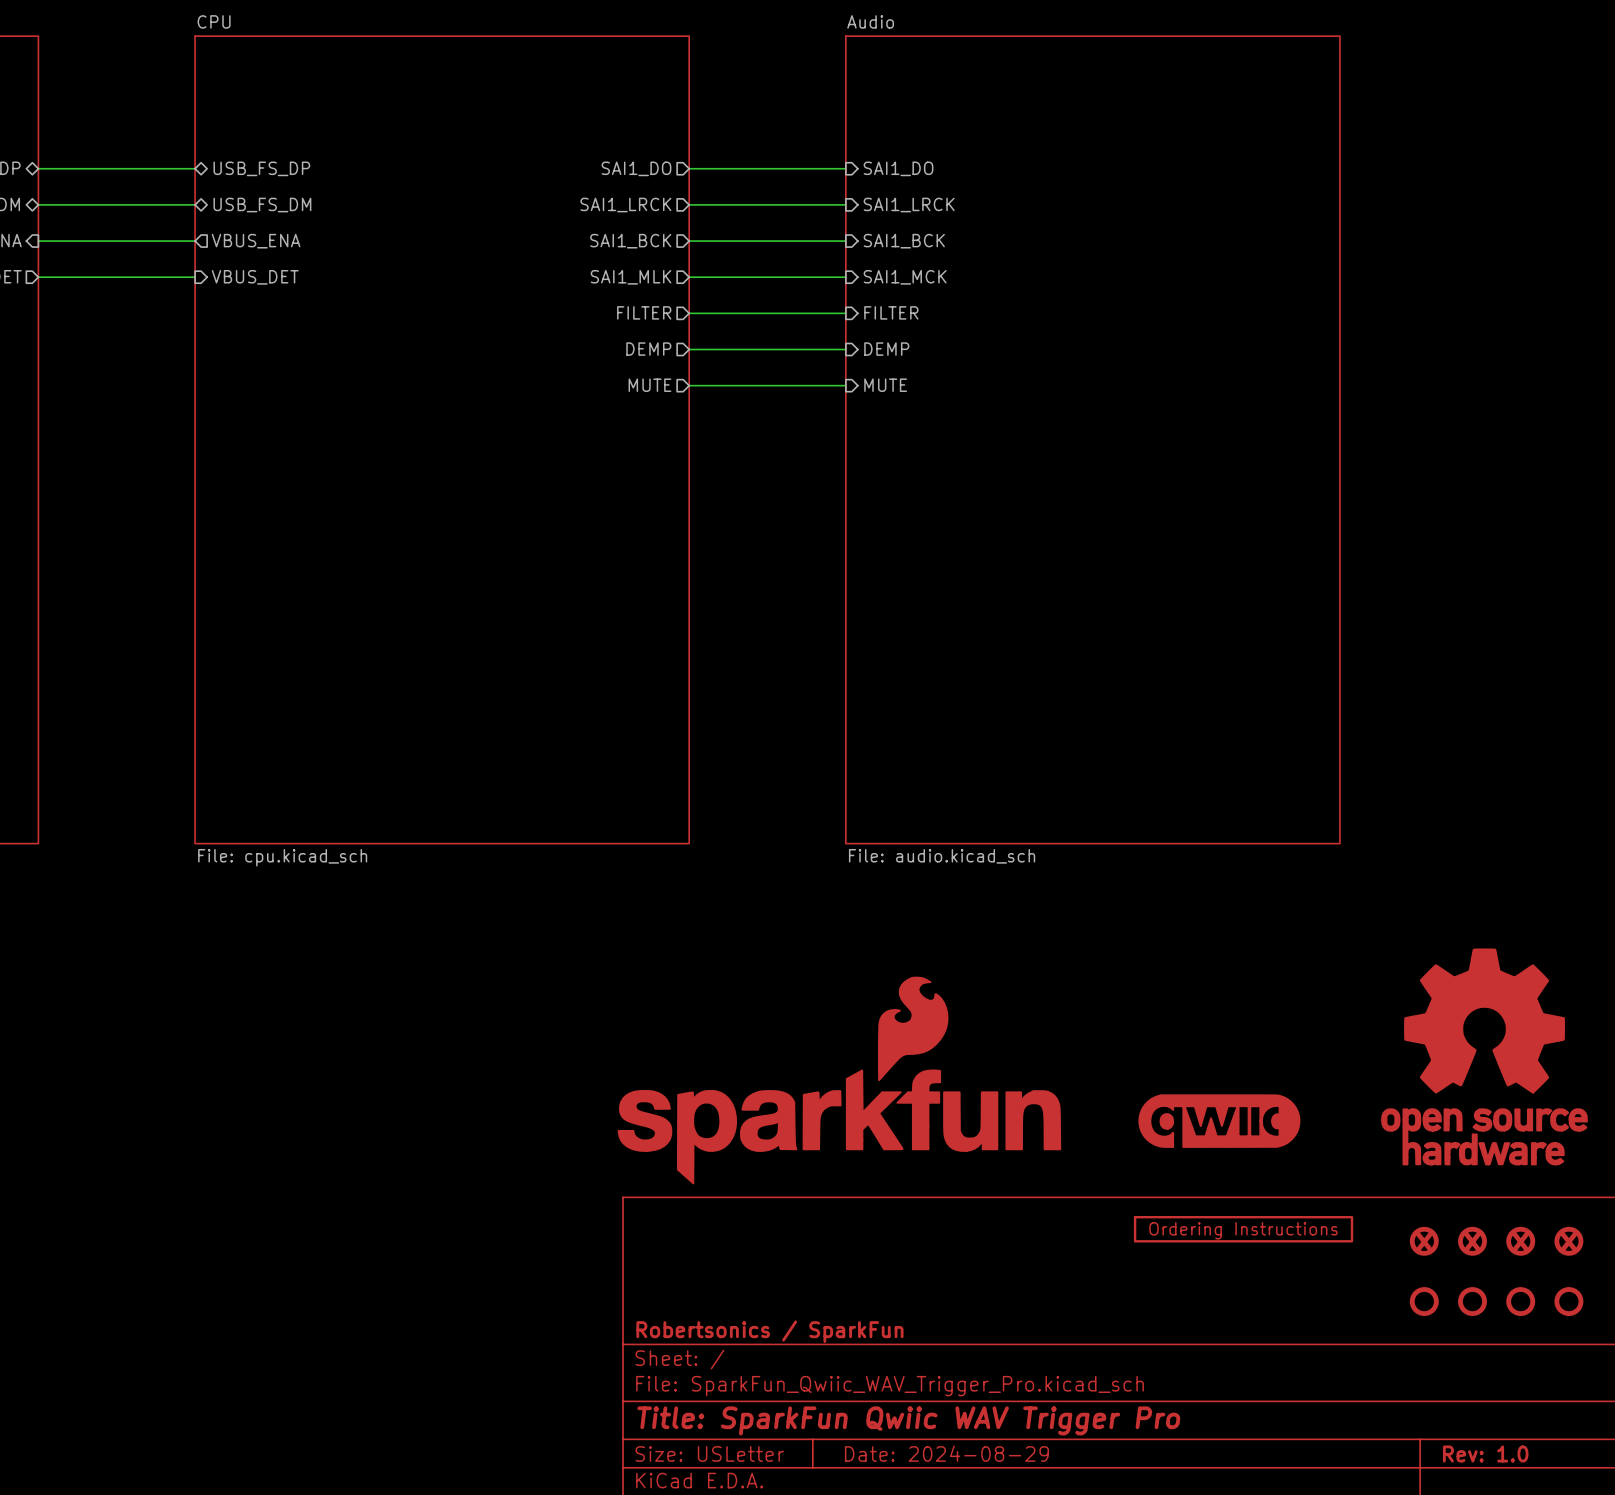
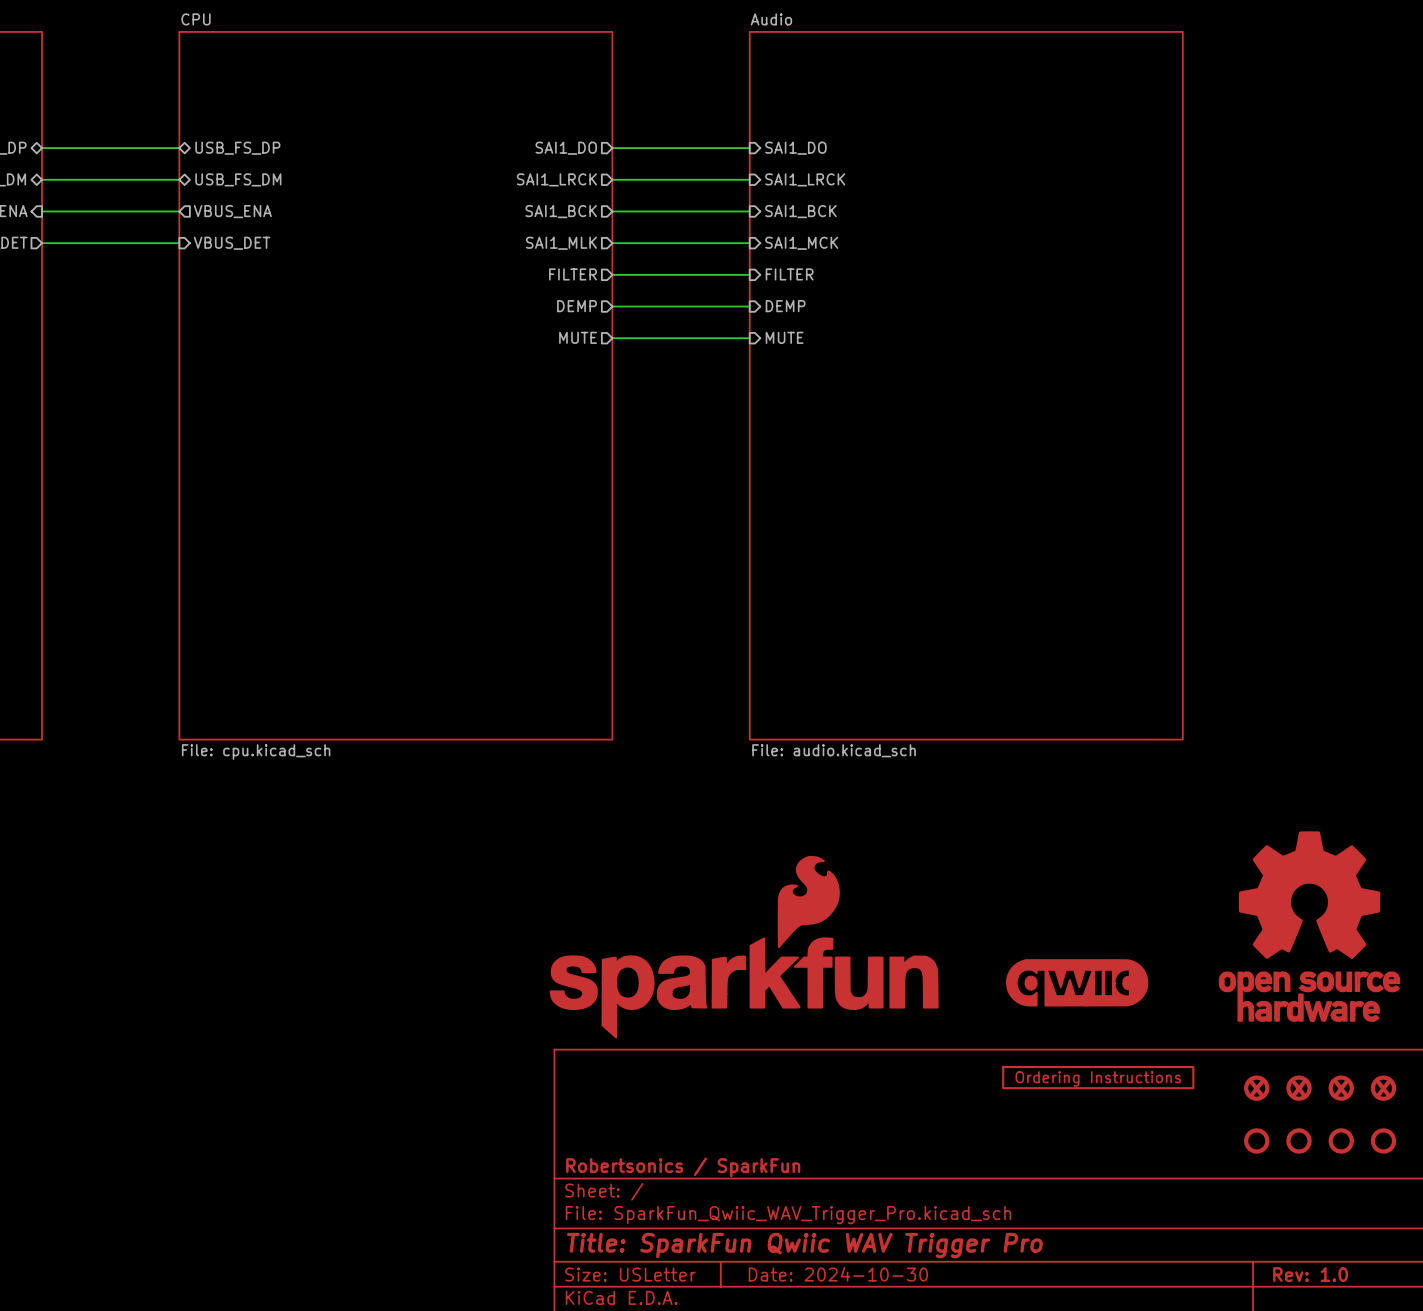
title block: Date: 2024-08-29 (946, 1453) -> Date: 2024-10-30 (838, 1274)

